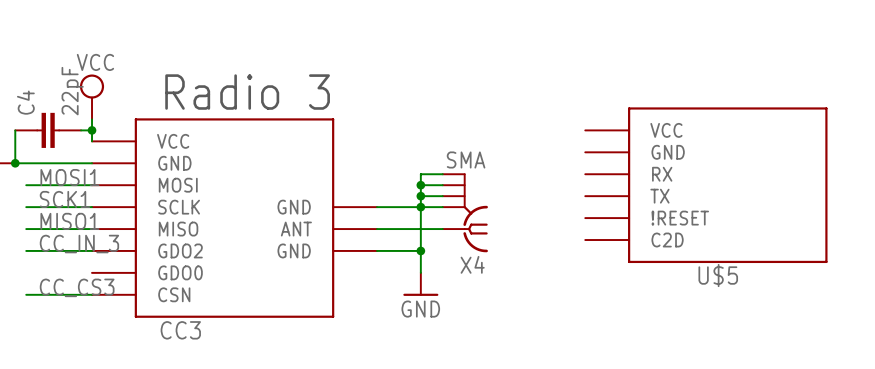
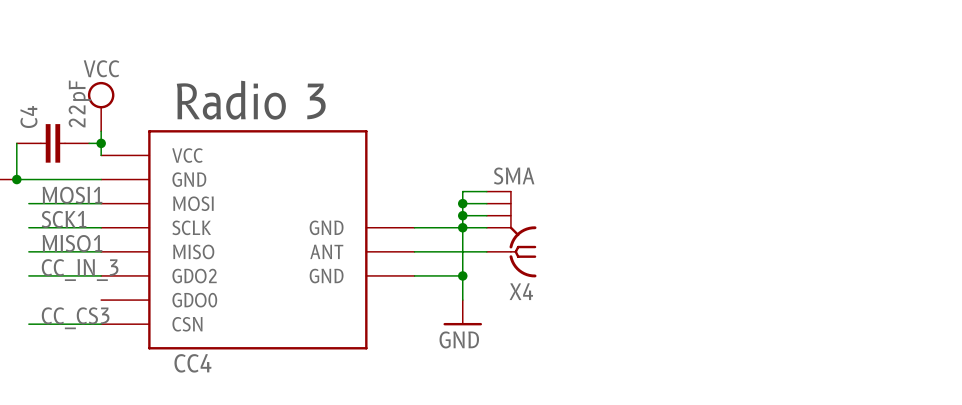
U$5: (706, 185) -> none
CC3 name: CC3 (180, 330) -> CC4 (192, 363)

